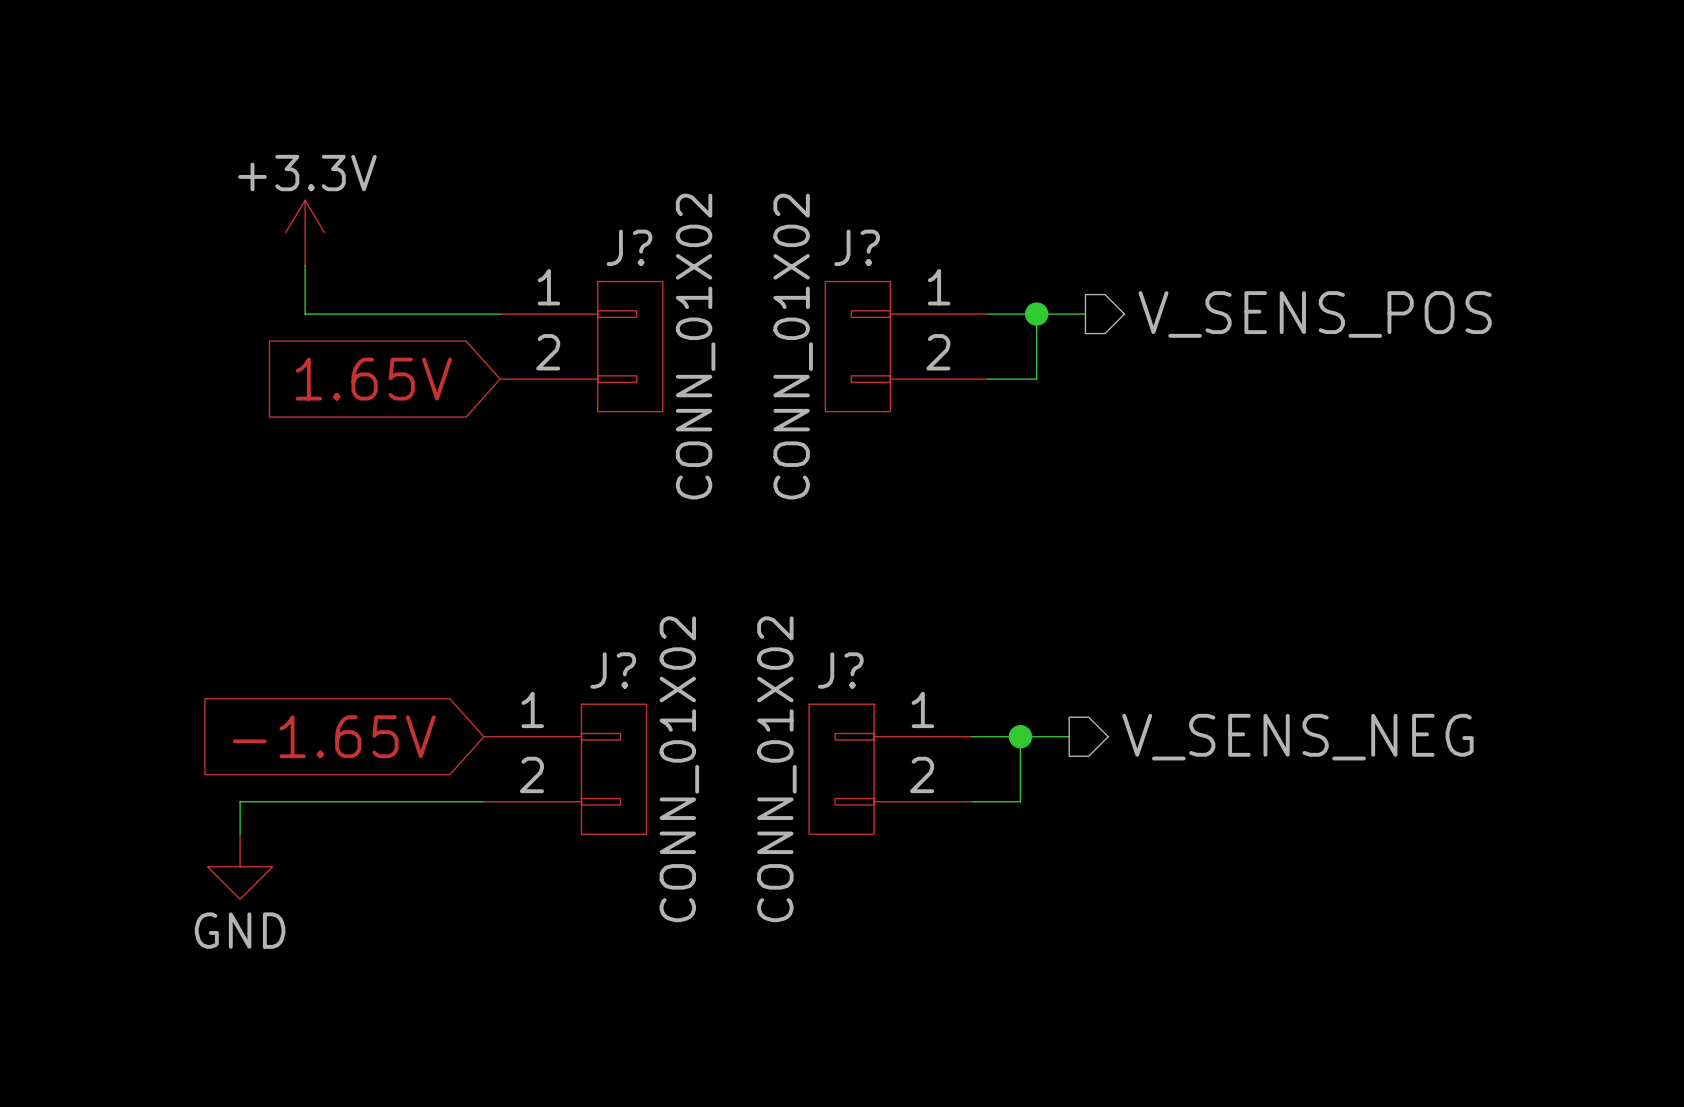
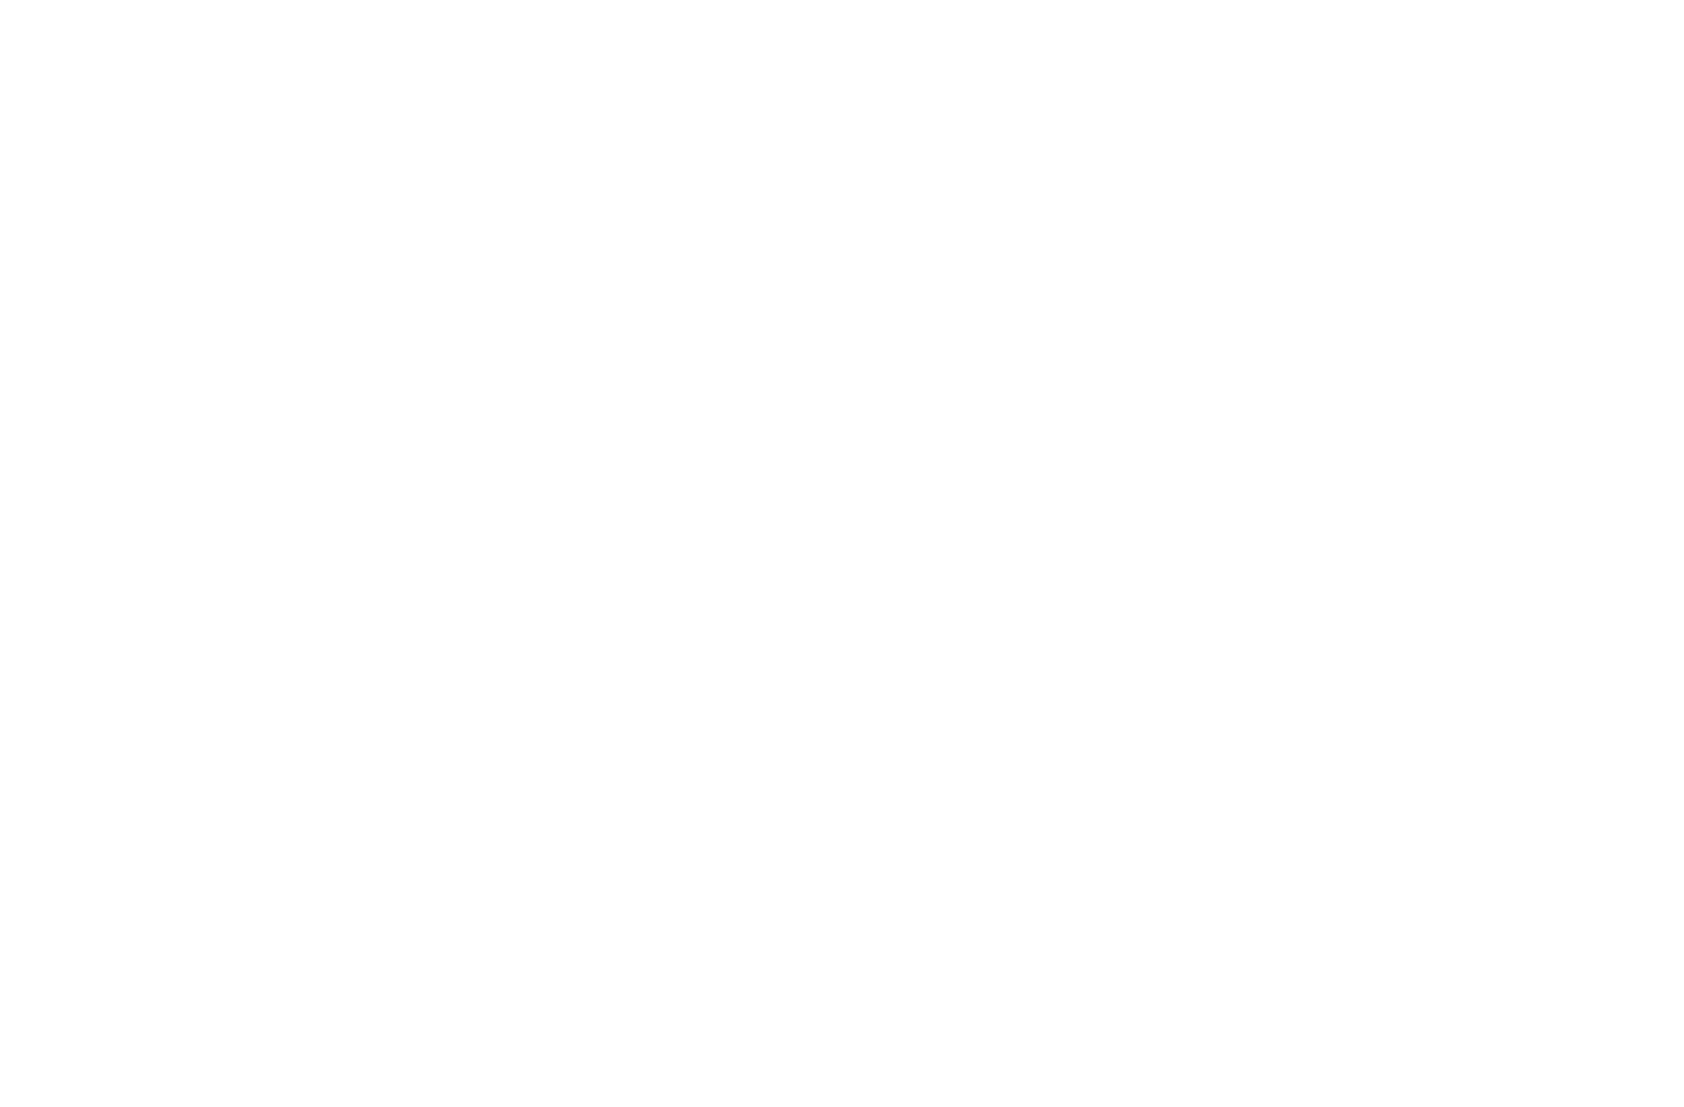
power symbol: +3.3V (305, 232) -> none
wire: (305, 265) (305, 314) (500, 314) -> none
wire: (987, 314) (1085, 314) -> none
wire: (1036, 314) (1036, 379) (987, 379) -> none
junction: (1036, 314) -> none
hierarchical label: V_SENS_POS (1315, 314) -> none
J?: CONN_01X02 (581, 346) -> none
J?: CONN_01X02 (906, 346) -> none
global label: 1.65V (373, 379) -> none
global label: -1.65V (334, 736) -> none
wire: (971, 736) (1069, 736) -> none
wire: (1020, 736) (1020, 801) (971, 801) -> none
junction: (1020, 736) -> none
hierarchical label: V_SENS_NEG (1297, 737) -> none
J?: CONN_01X02 (565, 769) -> none
J?: CONN_01X02 (890, 769) -> none
wire: (483, 801) (240, 801) (240, 834) -> none
power symbol: GND (240, 866) -> none

